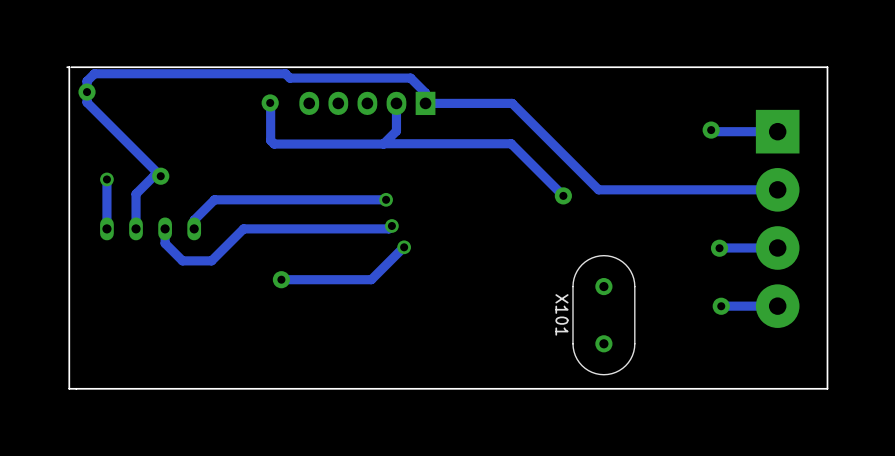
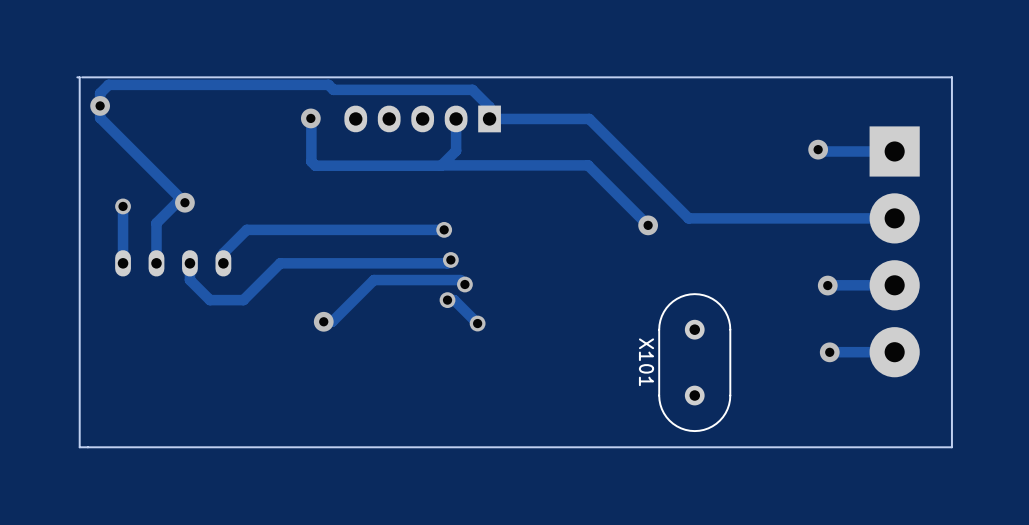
track: (404, 247) (371, 279) (288, 279) -> (460, 280) (373, 280) (332, 321)
track: none -> (447, 300) (454, 300) (477, 323)
via: none -> (447, 300)
via: none -> (477, 323)

